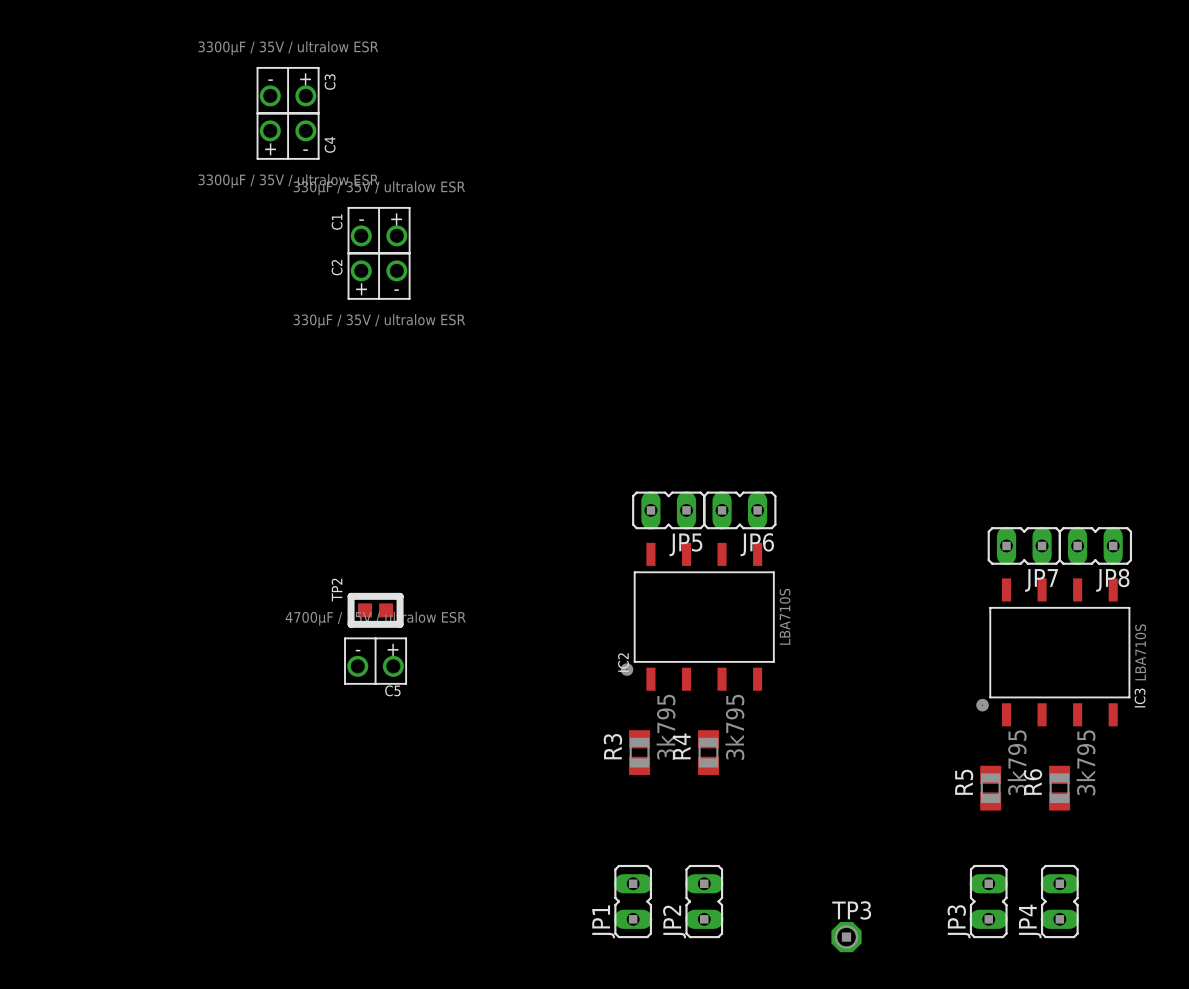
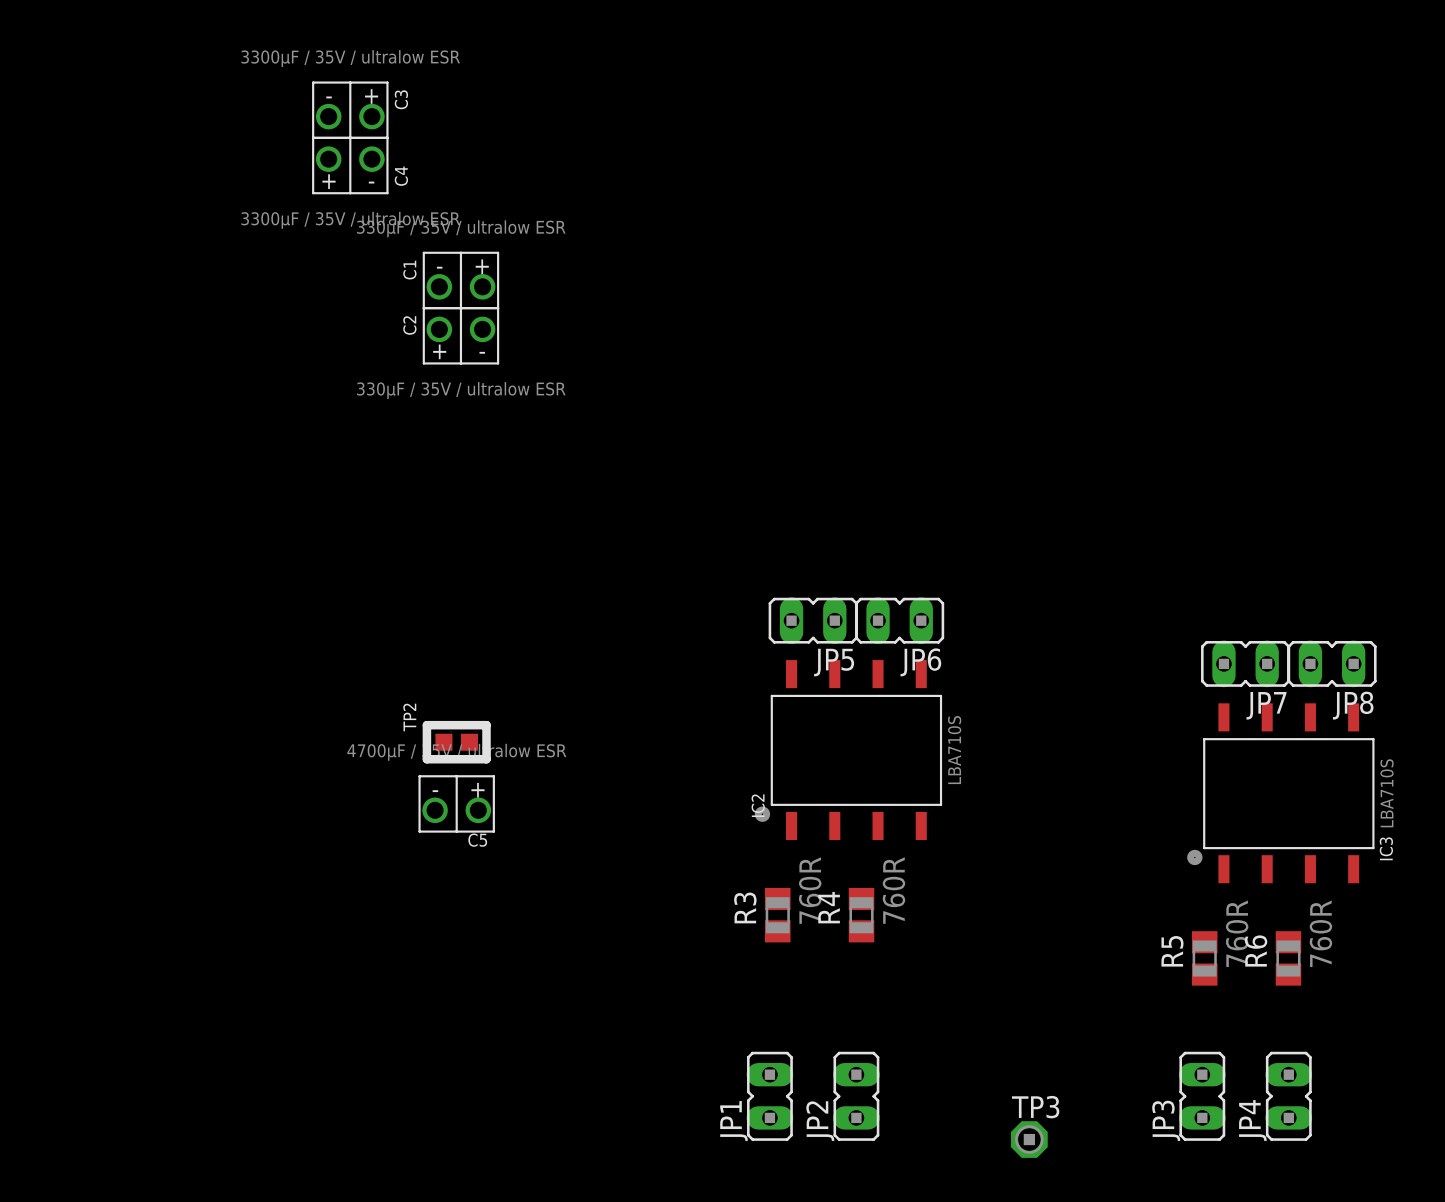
R3 value: 3k795 (666, 727) -> 760R (810, 890)
R4 value: 3k795 (734, 727) -> 760R (893, 890)
R5 value: 3k795 (1017, 762) -> 760R (1237, 933)
R6 value: 3k795 (1086, 762) -> 760R (1320, 933)

